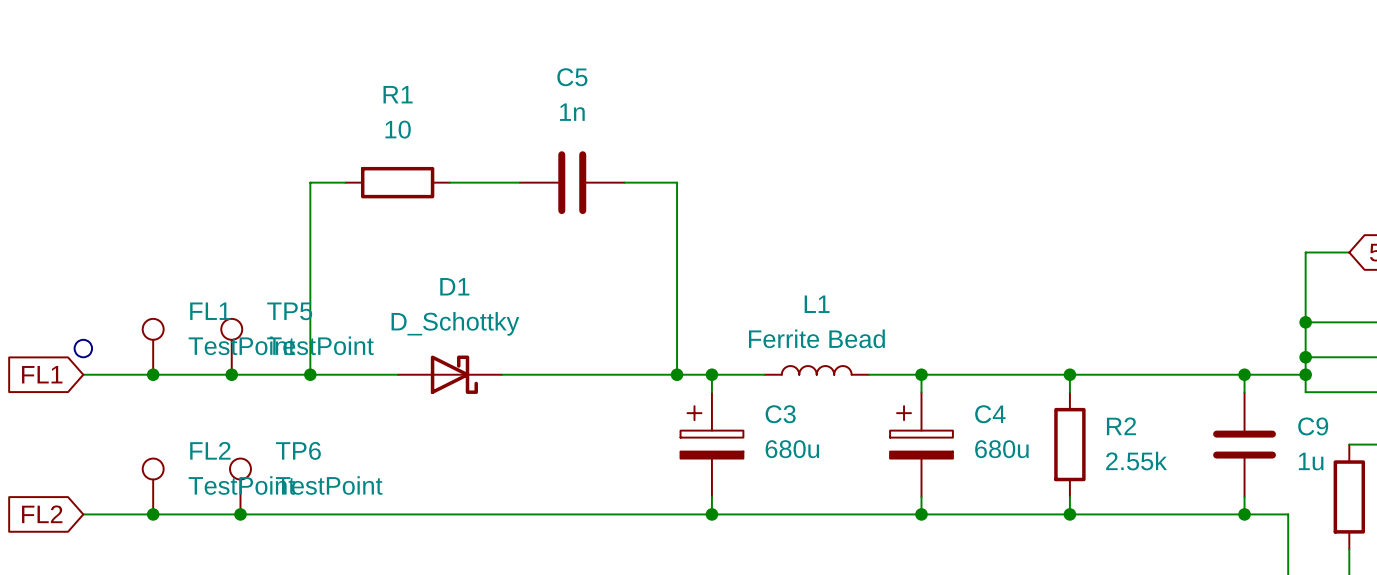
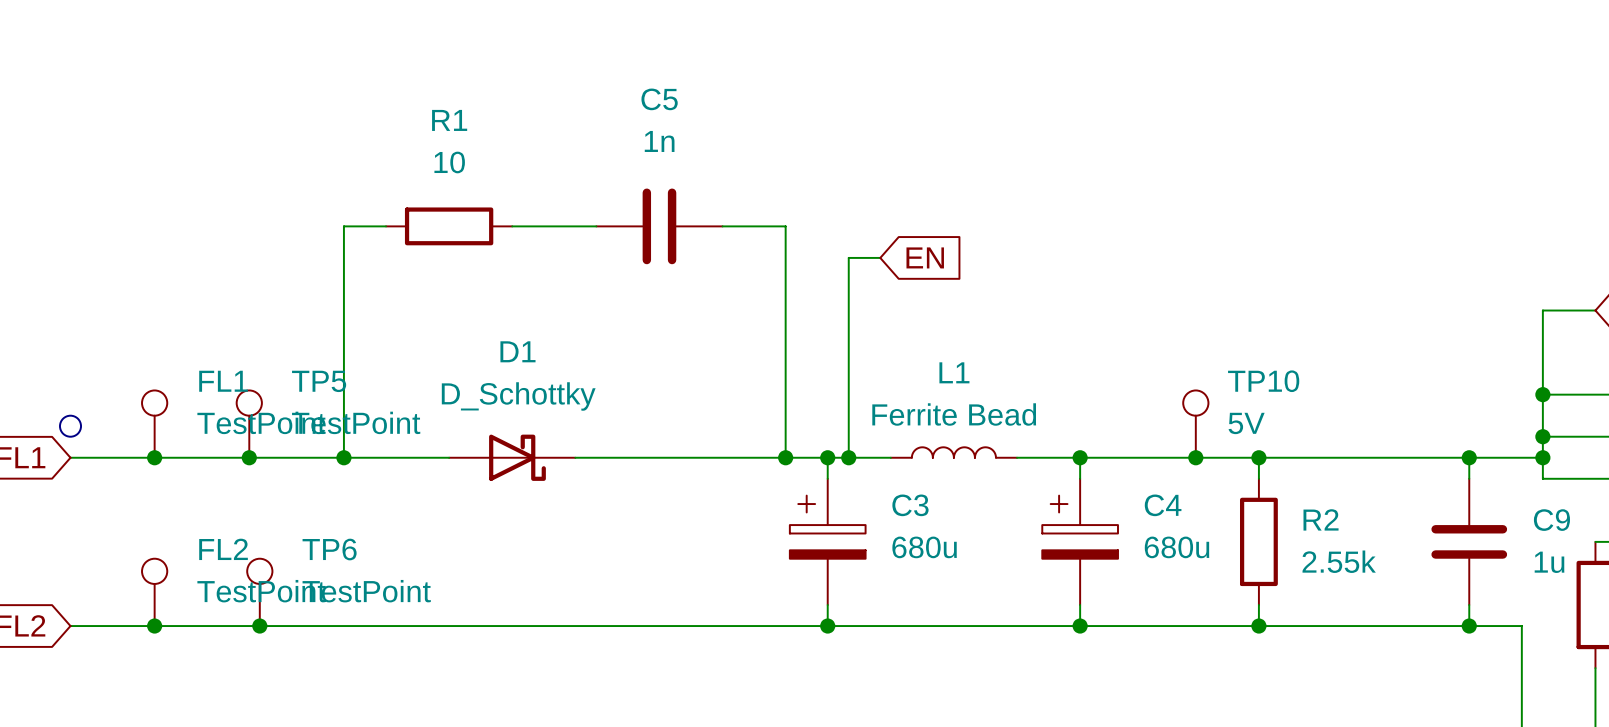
wire: none -> (880, 257) (848, 257) (848, 457)
global label: none -> EN (925, 257)
TP10: none -> 5V (1195, 424)
junction: none -> (848, 457)
junction: none -> (1195, 457)

